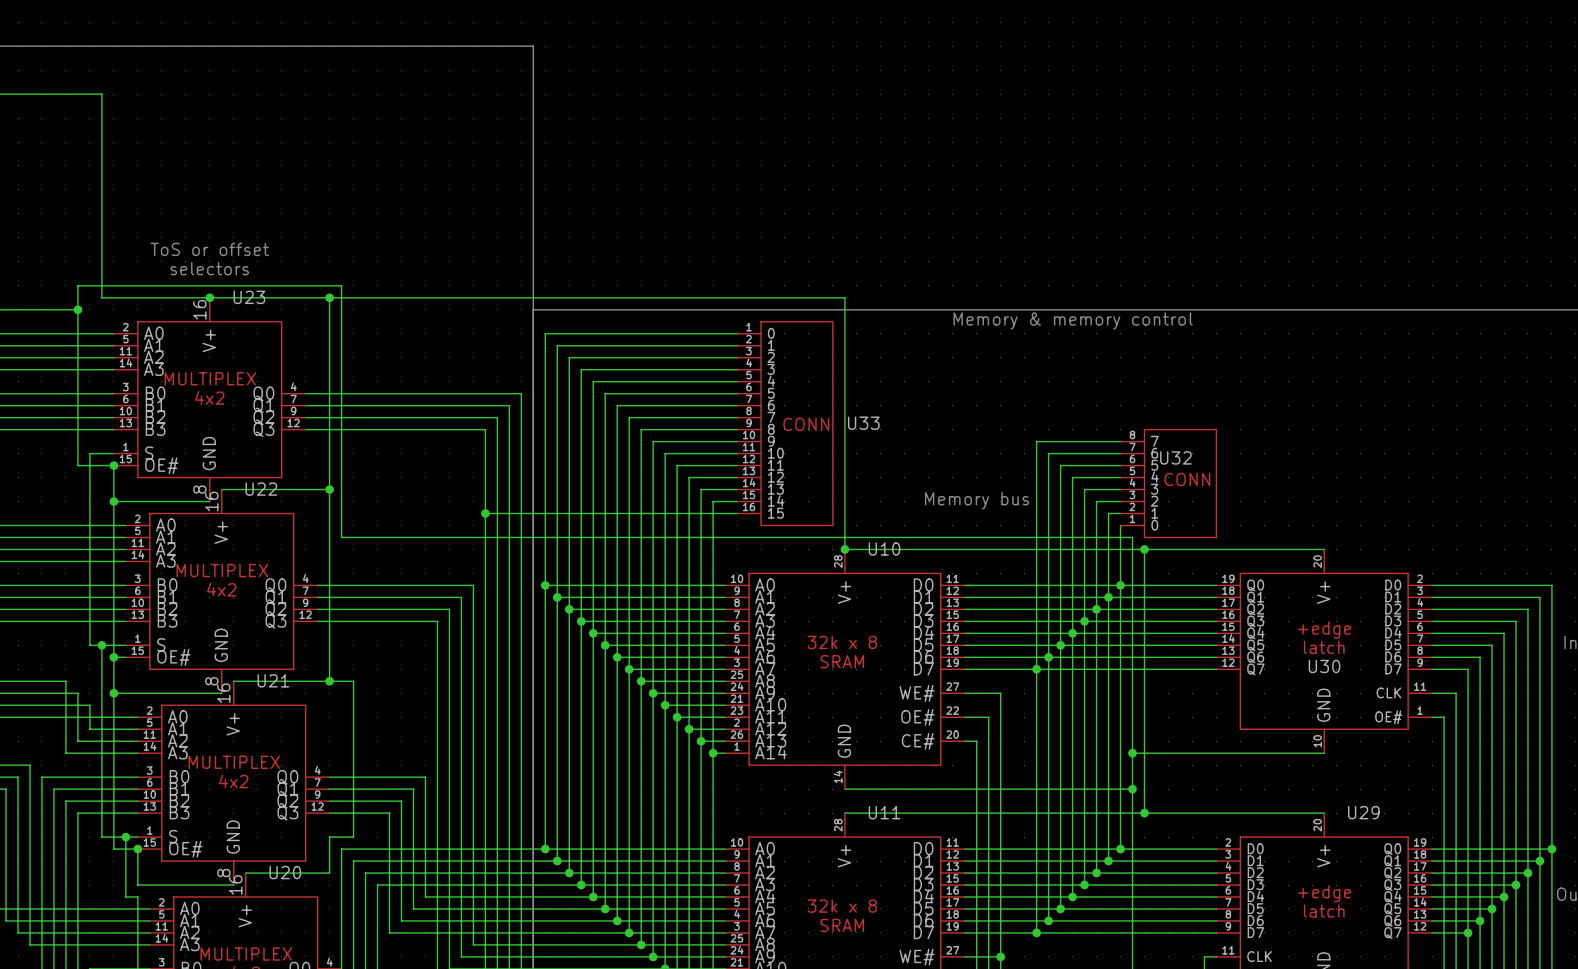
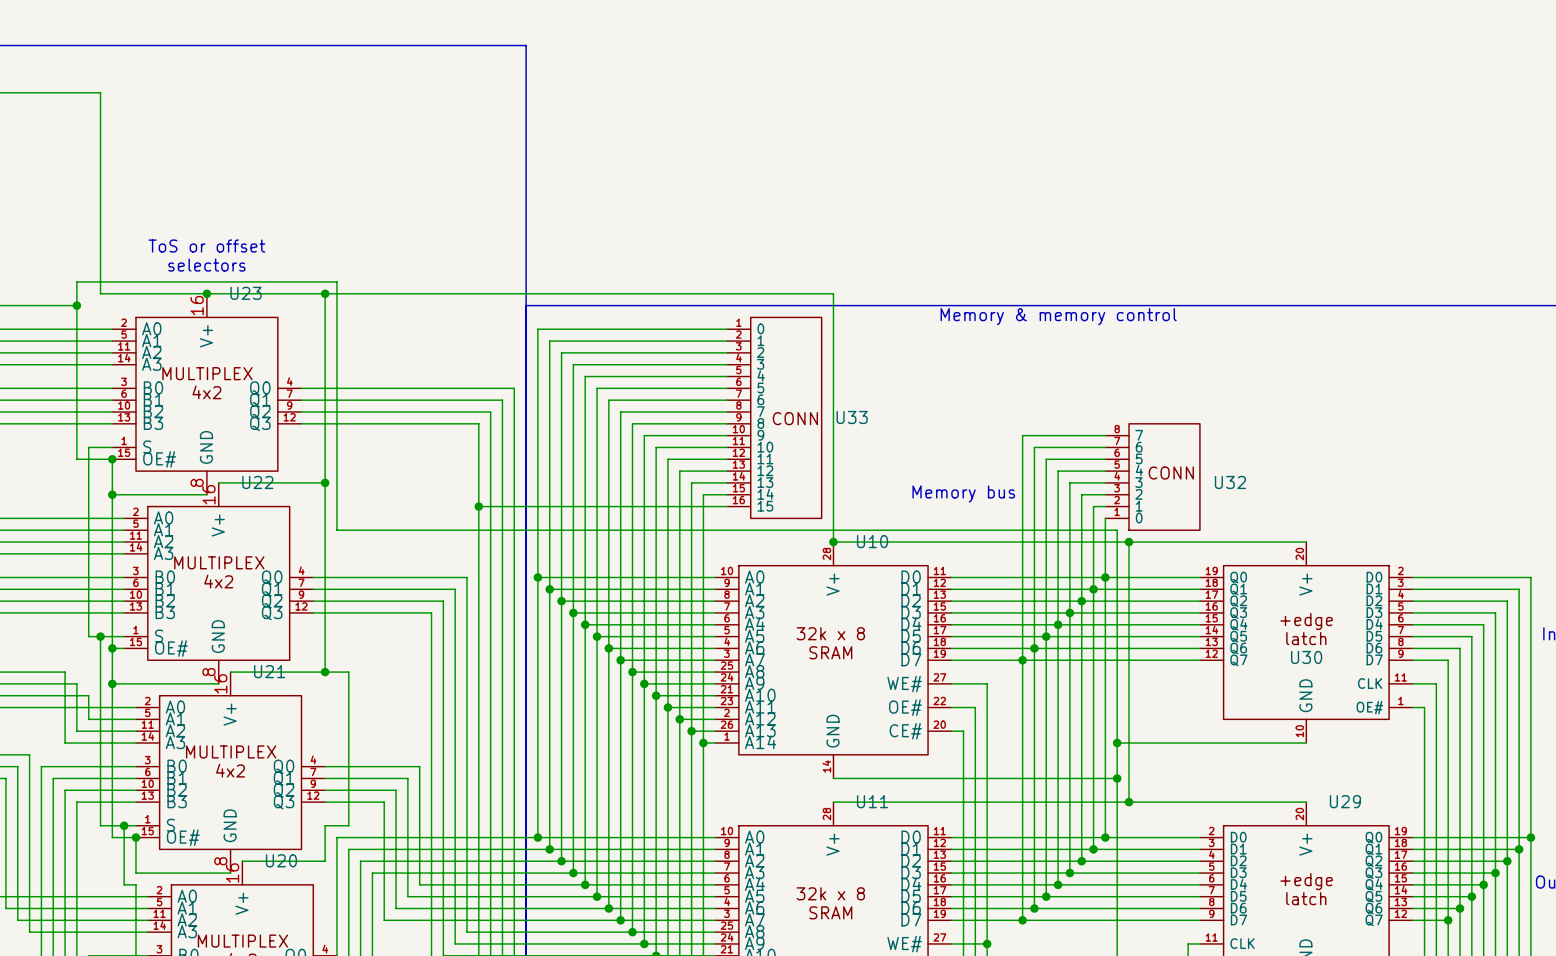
U32 name position: U32 (1175, 457) -> U32 (1230, 482)

